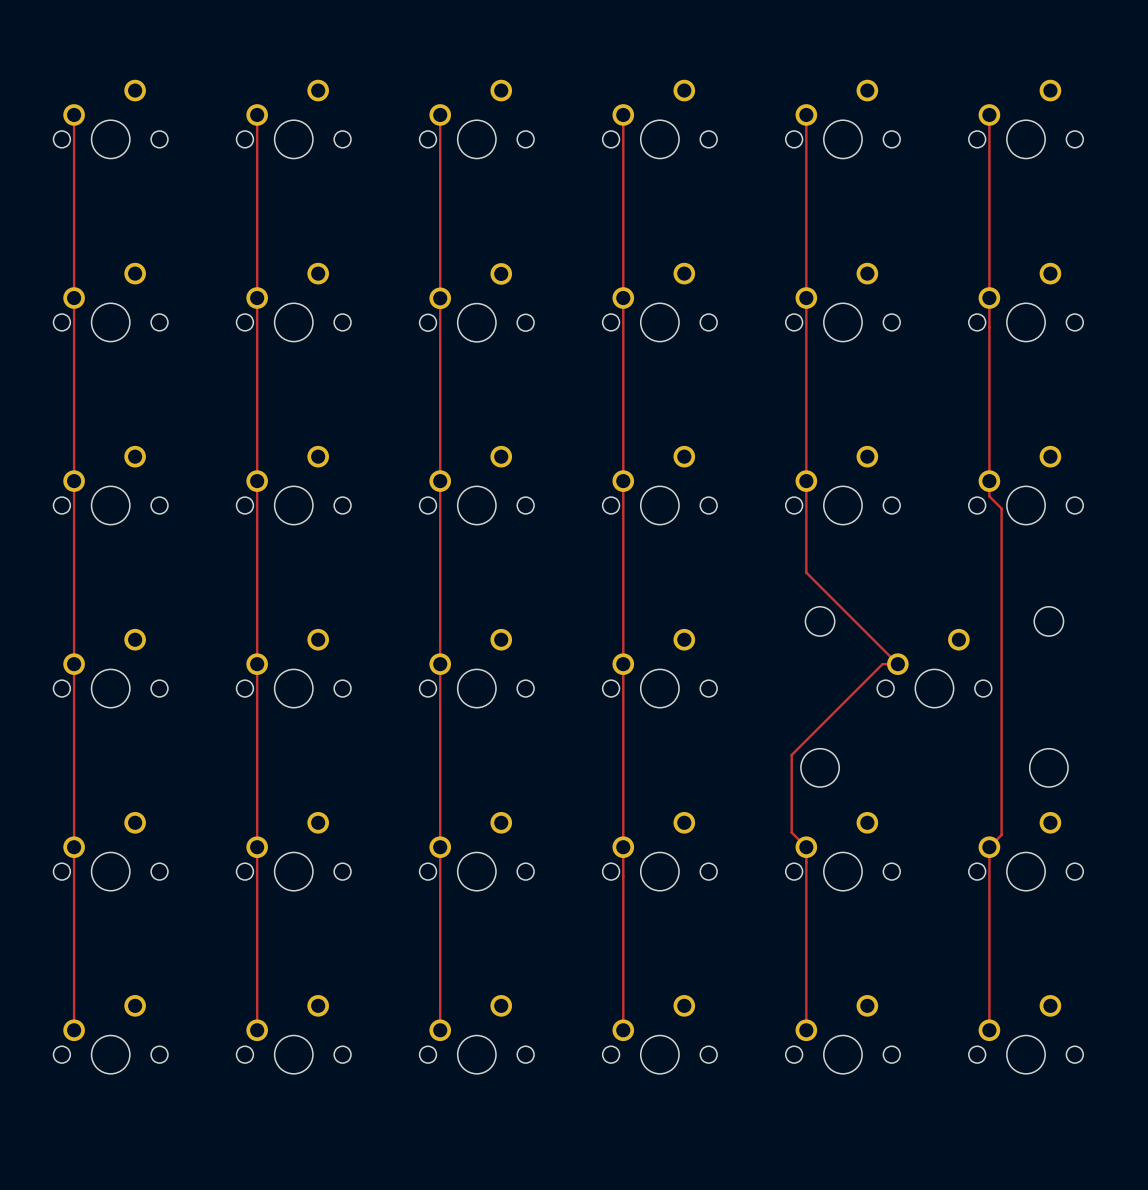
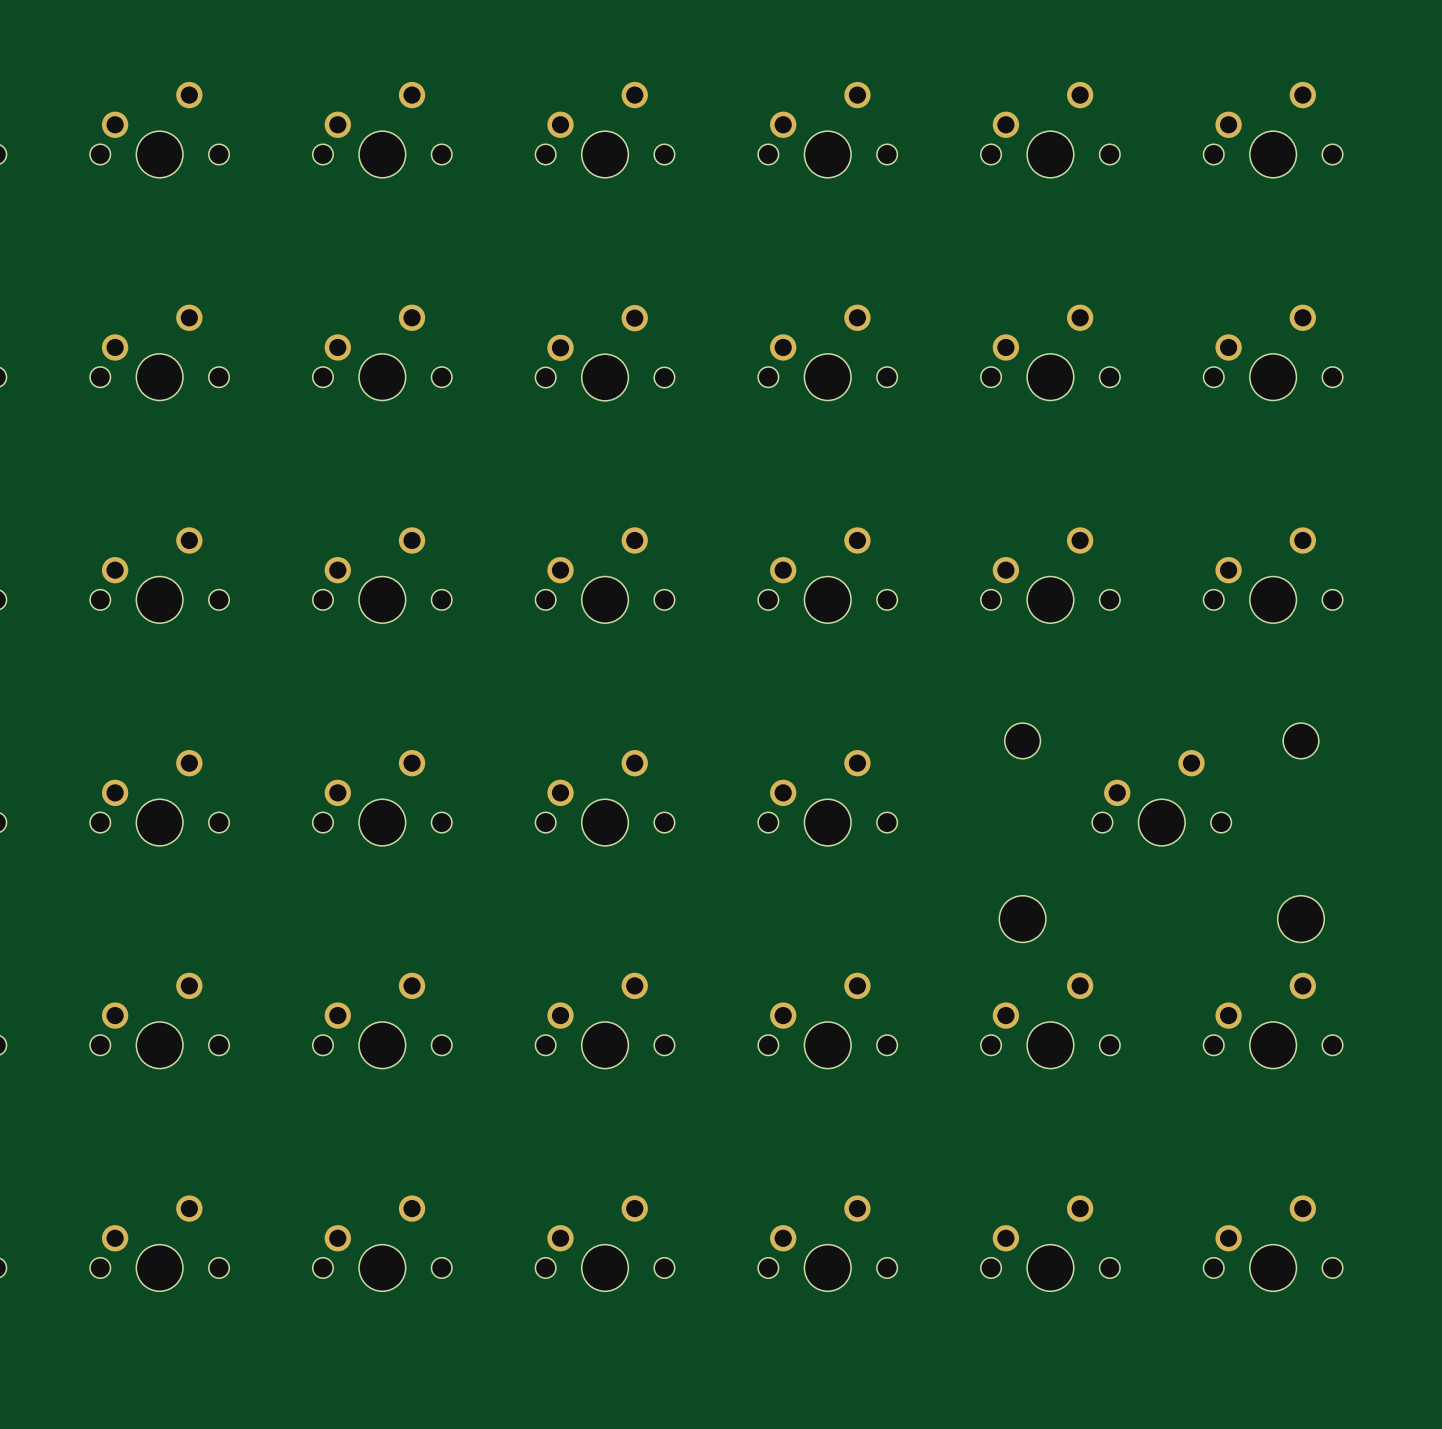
track: (74, 114) (74, 1030) -> none
track: (257, 114) (257, 1030) -> none
track: (440, 114) (440, 1030) -> none
track: (623, 114) (623, 1030) -> none
track: (806, 114) (806, 572) (897, 664) (882, 664) (791, 755) (791, 832) (806, 847) (806, 1030) -> none
track: (989, 114) (989, 496) (1001, 508) (1001, 835) (989, 847) (989, 1030) -> none

